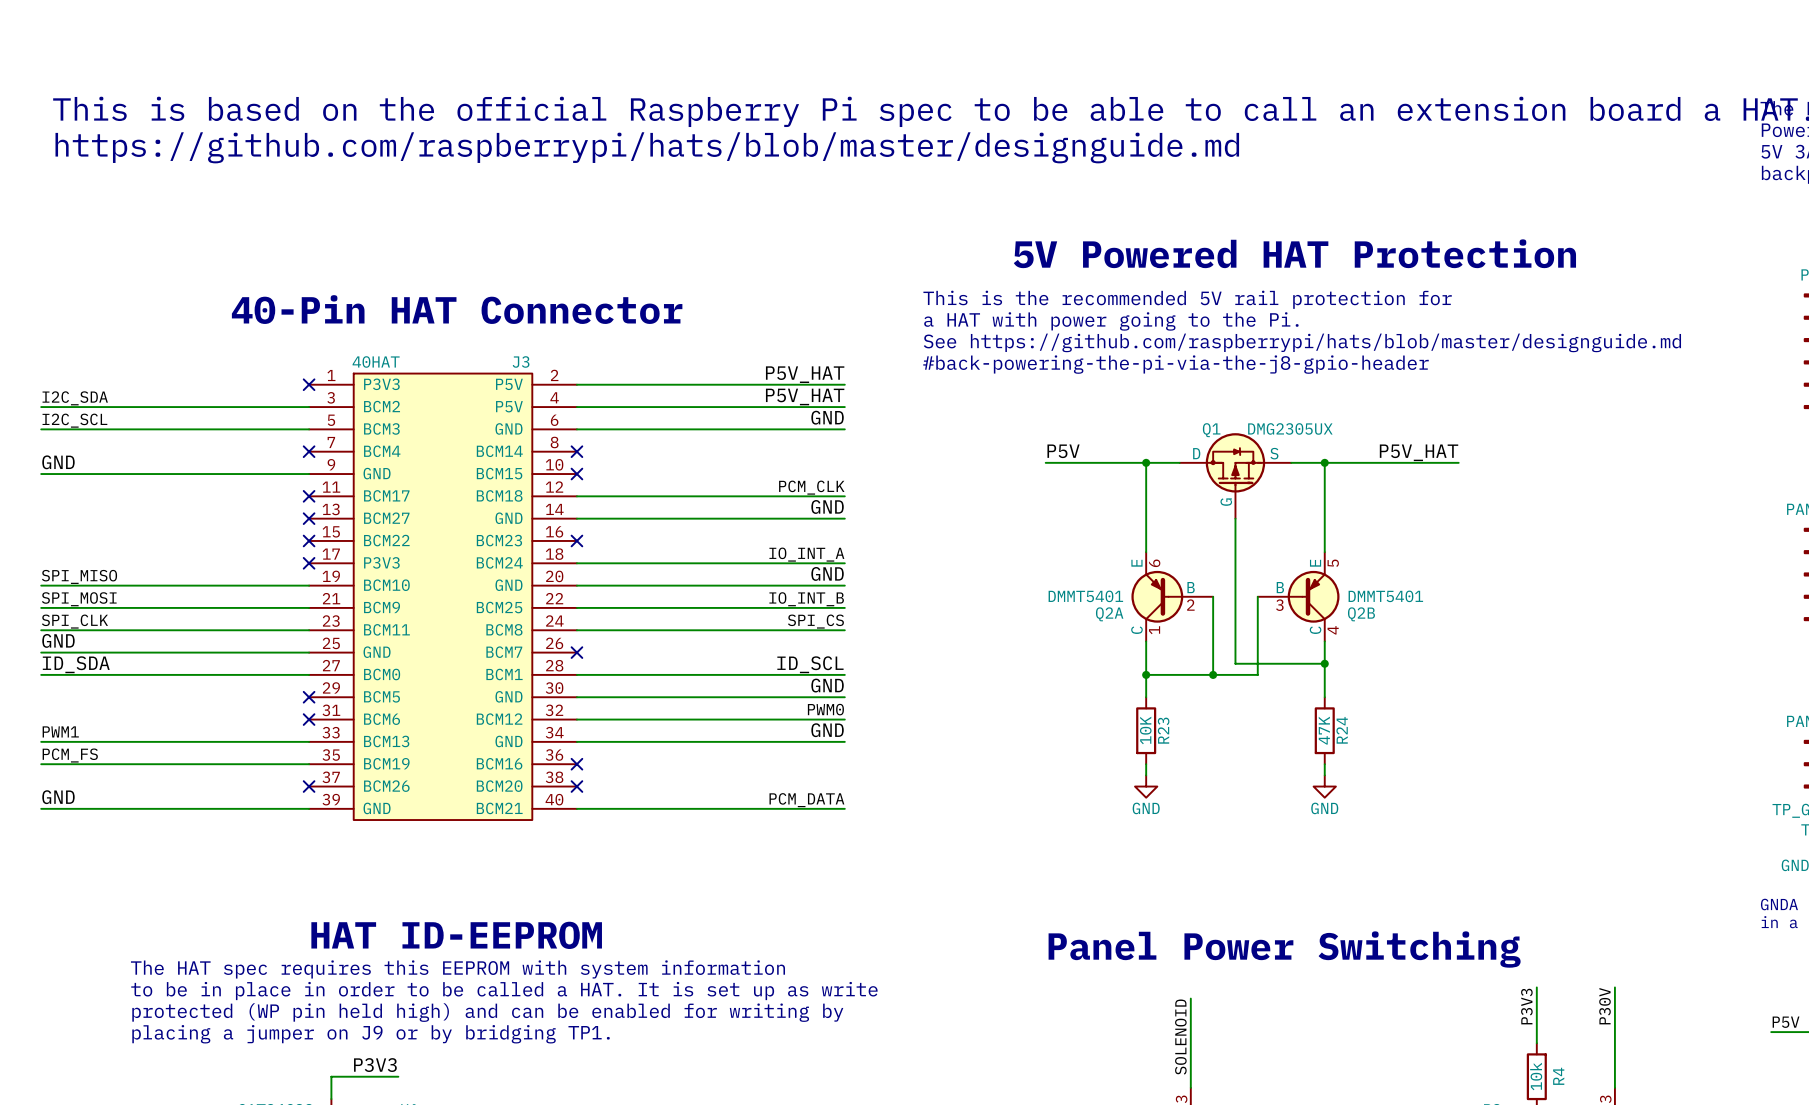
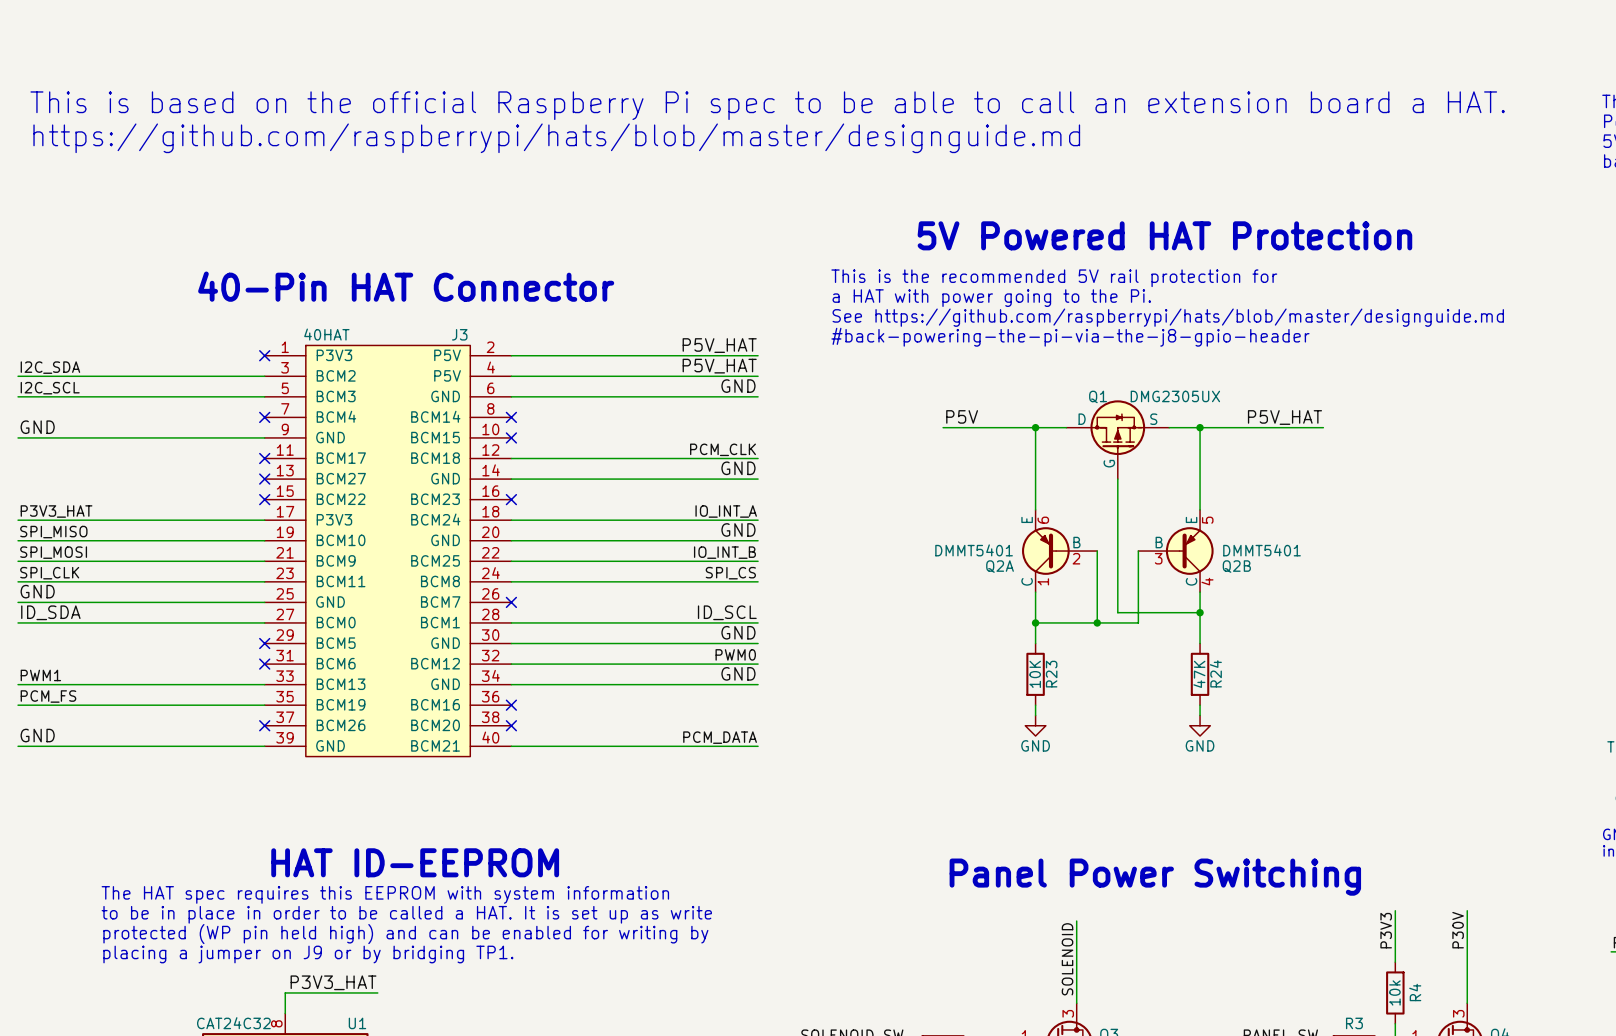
label: none -> P3V3_HAT (56, 511)
wire: none -> (18, 520) (264, 520)
no-connect mark: (309, 563) -> none
label: P3V3 (375, 1065) -> P3V3_HAT (333, 982)
wire: none -> (346, 992) (377, 992)

